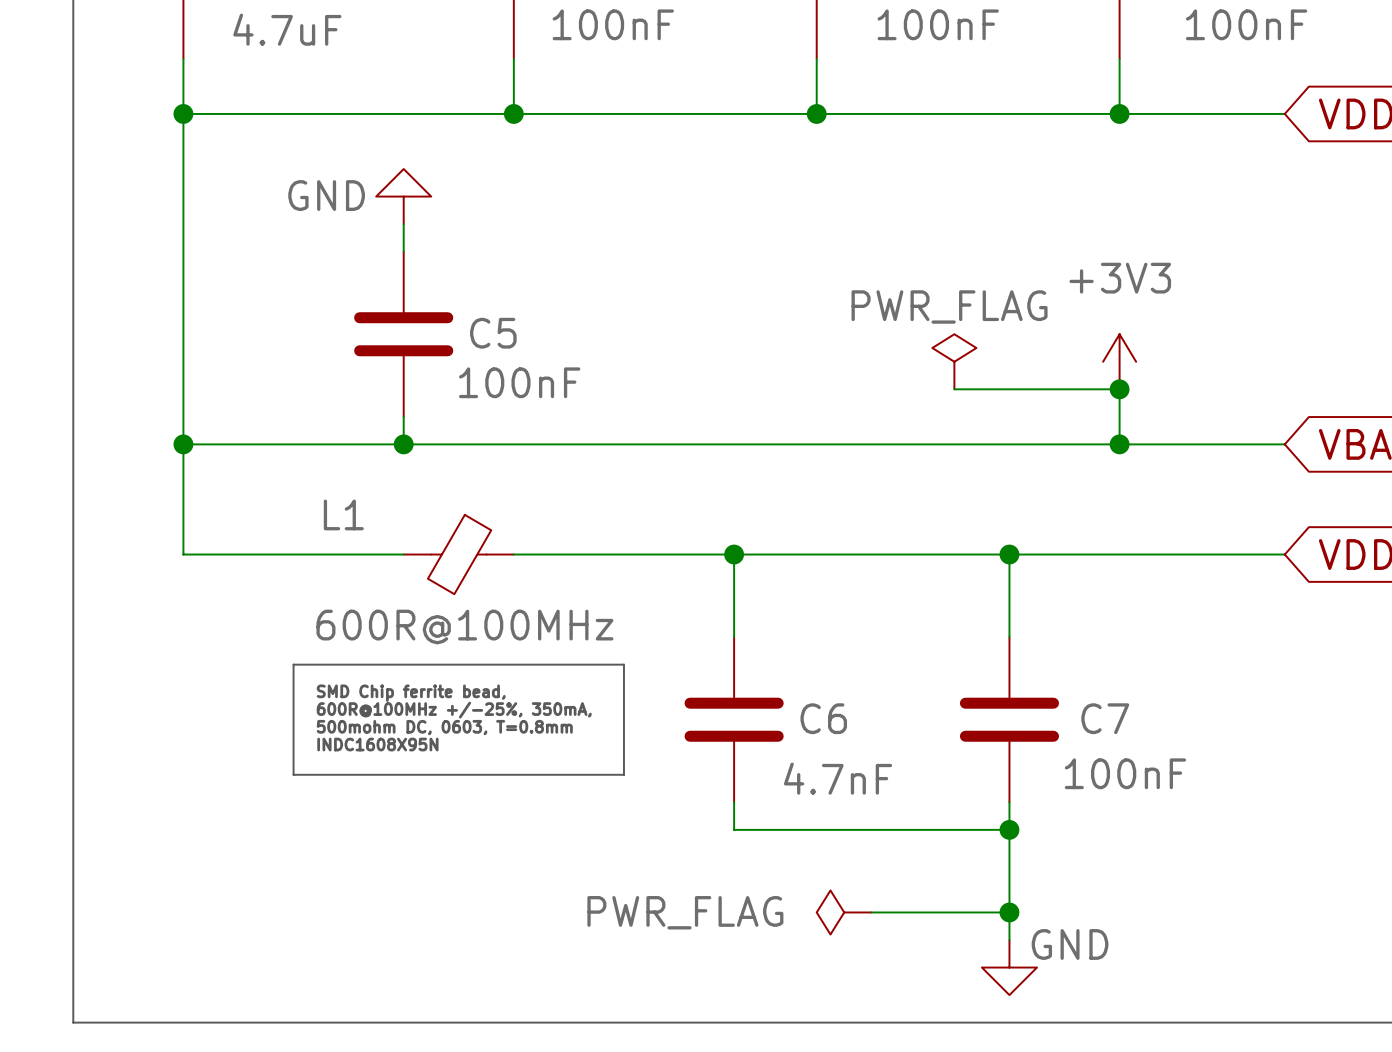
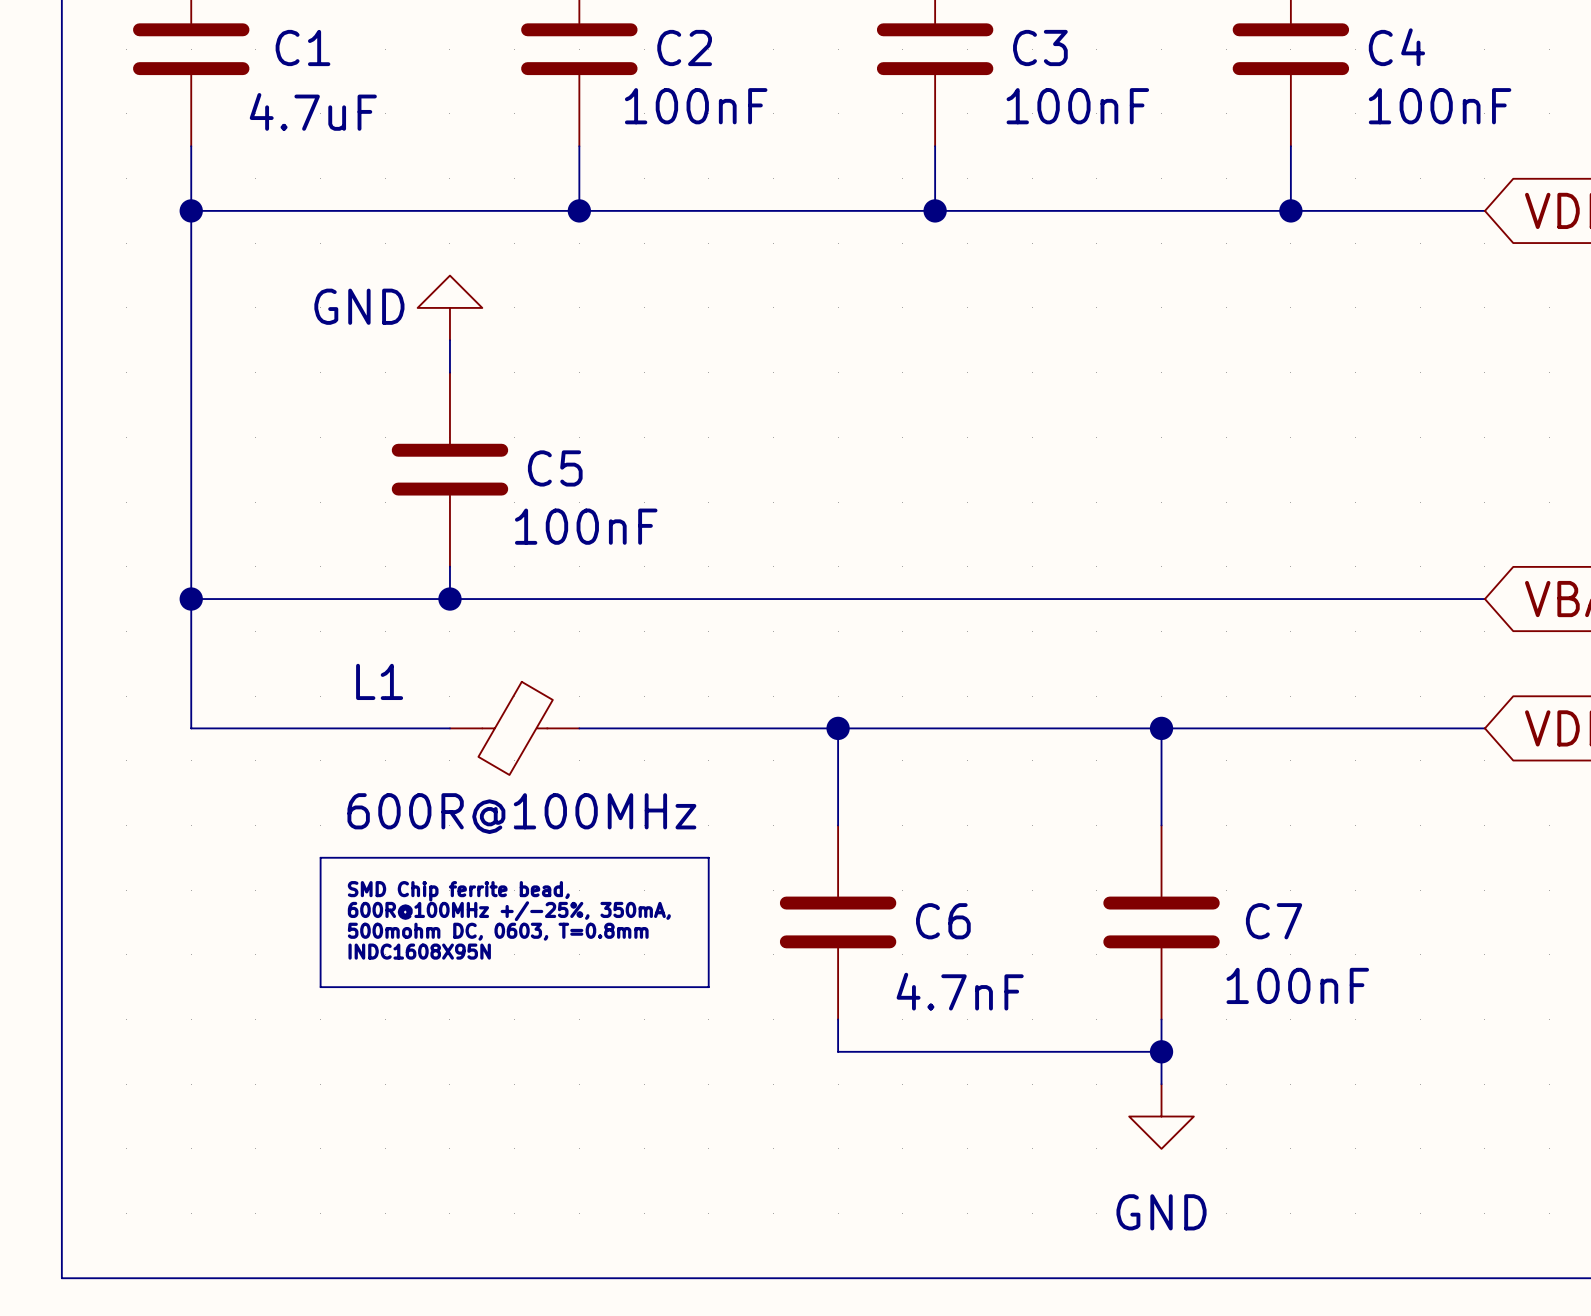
power symbol: PWR_FLAG (954, 361) -> none
power symbol: +3V3 (1119, 361) -> none
wire: (954, 389) (1119, 389) (1119, 444) -> none
junction: (1119, 389) -> none
junction: (1119, 444) -> none
wire: (1009, 857) (1009, 940) -> none
power symbol: PWR_FLAG (844, 912) -> none
wire: (871, 912) (1009, 912) -> none
junction: (1009, 912) -> none
power symbol text position: GND (1070, 944) -> GND (1161, 1212)
power symbol position: GND (1009, 967) -> GND (1161, 1116)

